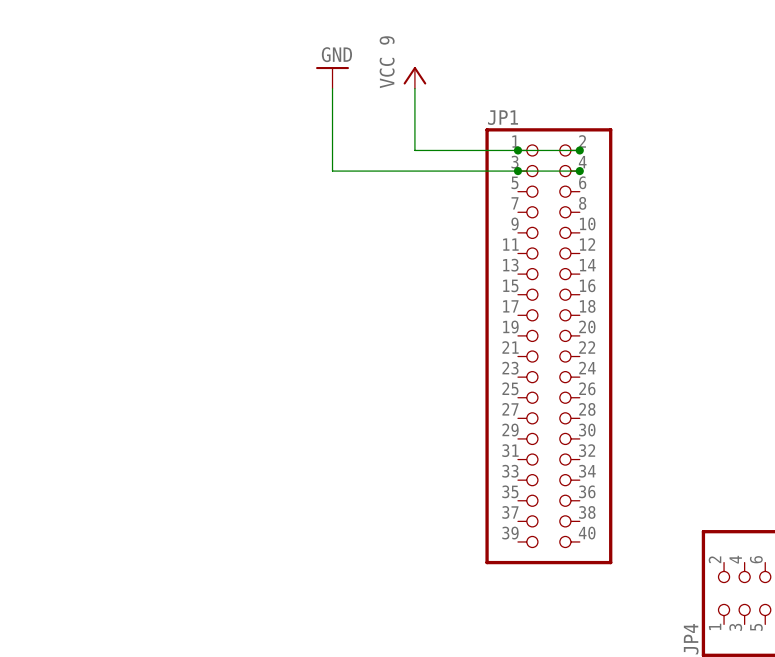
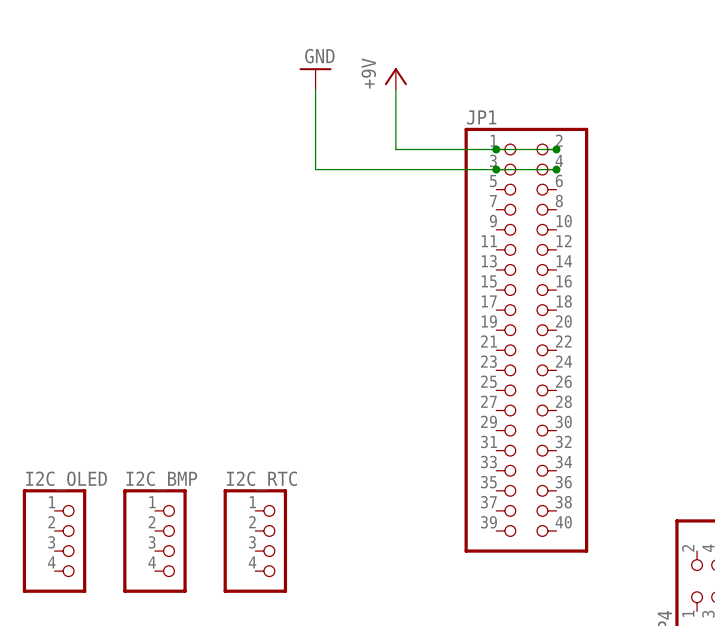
power symbol: VCC 9 (414, 77) -> +9V (395, 78)
I2C_OLED: none -> (54, 541)
I2C_BMP: none -> (154, 541)
I2C_RTC: none -> (255, 541)

